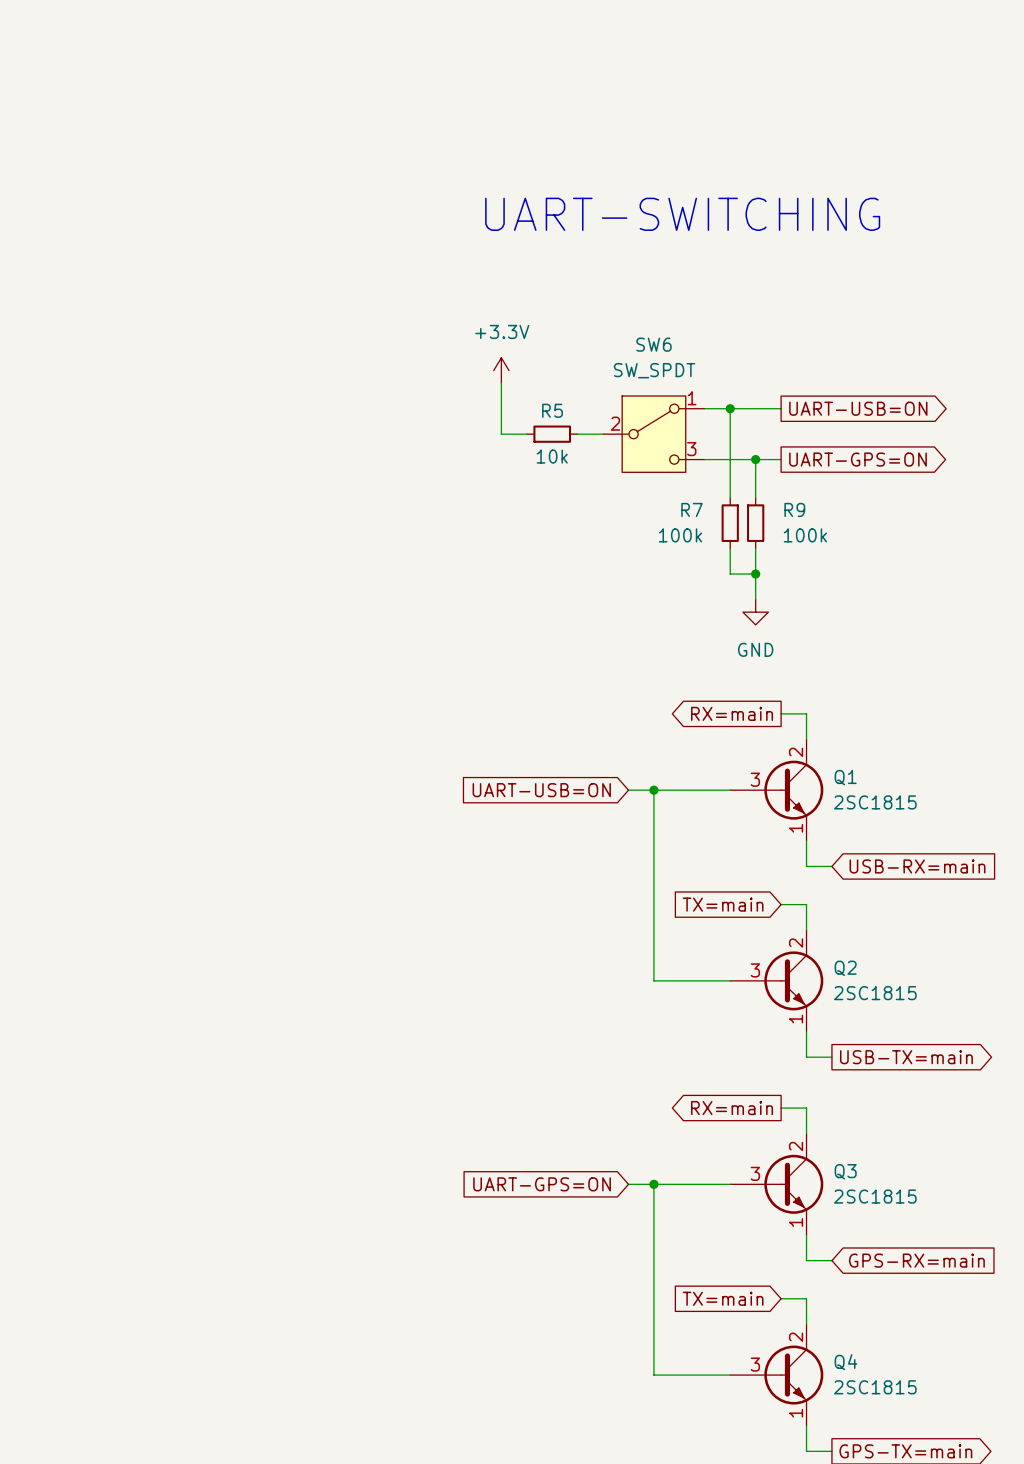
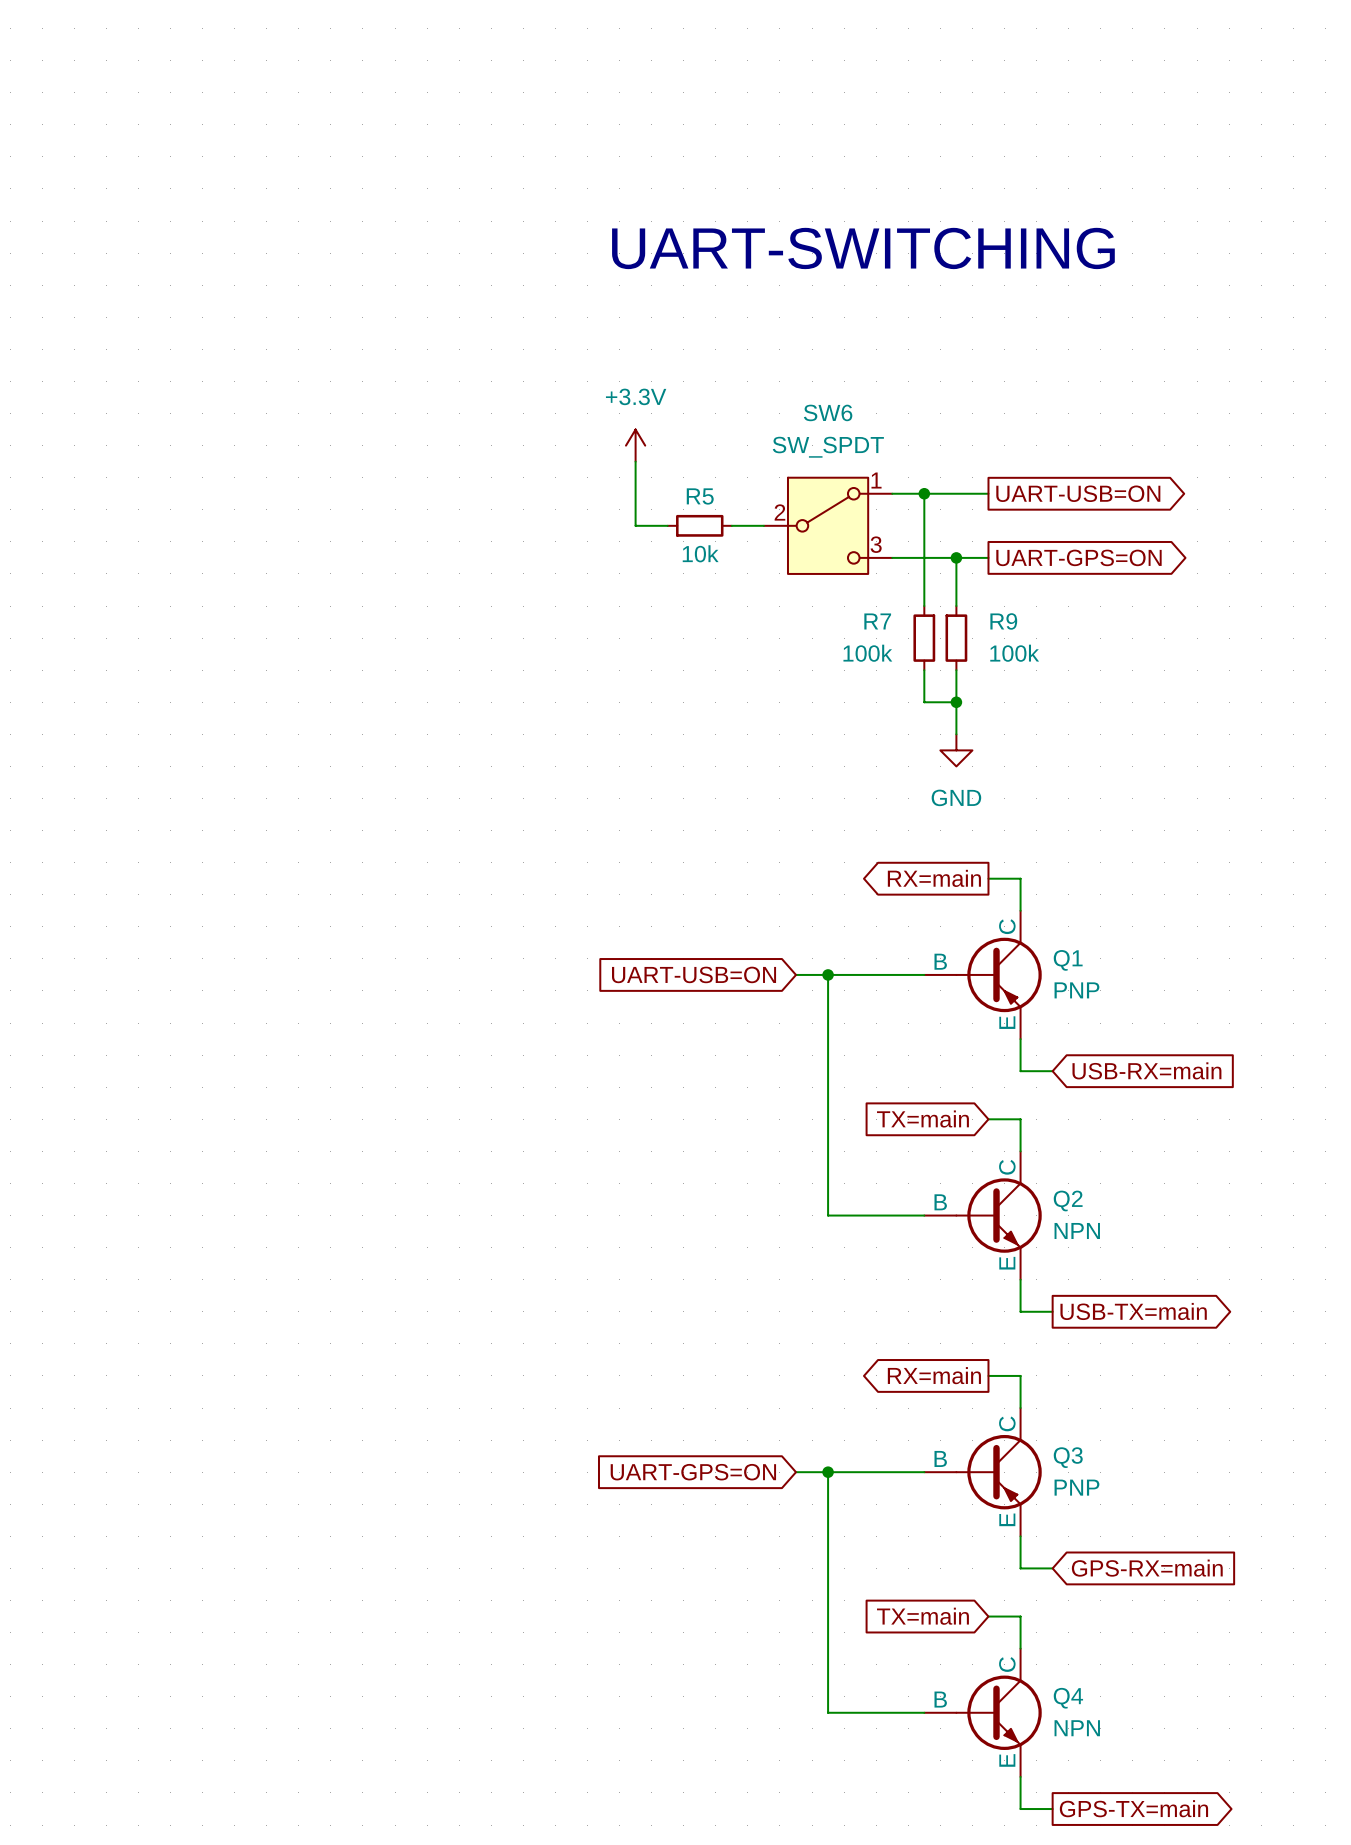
Q1 symbol: [730, 739, 824, 842] -> [924, 910, 1042, 1040]
Q1 value: 2SC1815 (875, 802) -> PNP (1076, 990)
Q2 symbol: [730, 930, 824, 1032] -> [924, 1151, 1042, 1280]
Q2 value: 2SC1815 (875, 993) -> NPN (1077, 1230)
Q3 symbol: [730, 1133, 824, 1236] -> [924, 1408, 1042, 1537]
Q3 value: 2SC1815 (875, 1196) -> PNP (1076, 1487)
Q4 symbol: [730, 1324, 824, 1426] -> [924, 1648, 1042, 1777]
Q4 value: 2SC1815 (875, 1387) -> NPN (1077, 1728)

